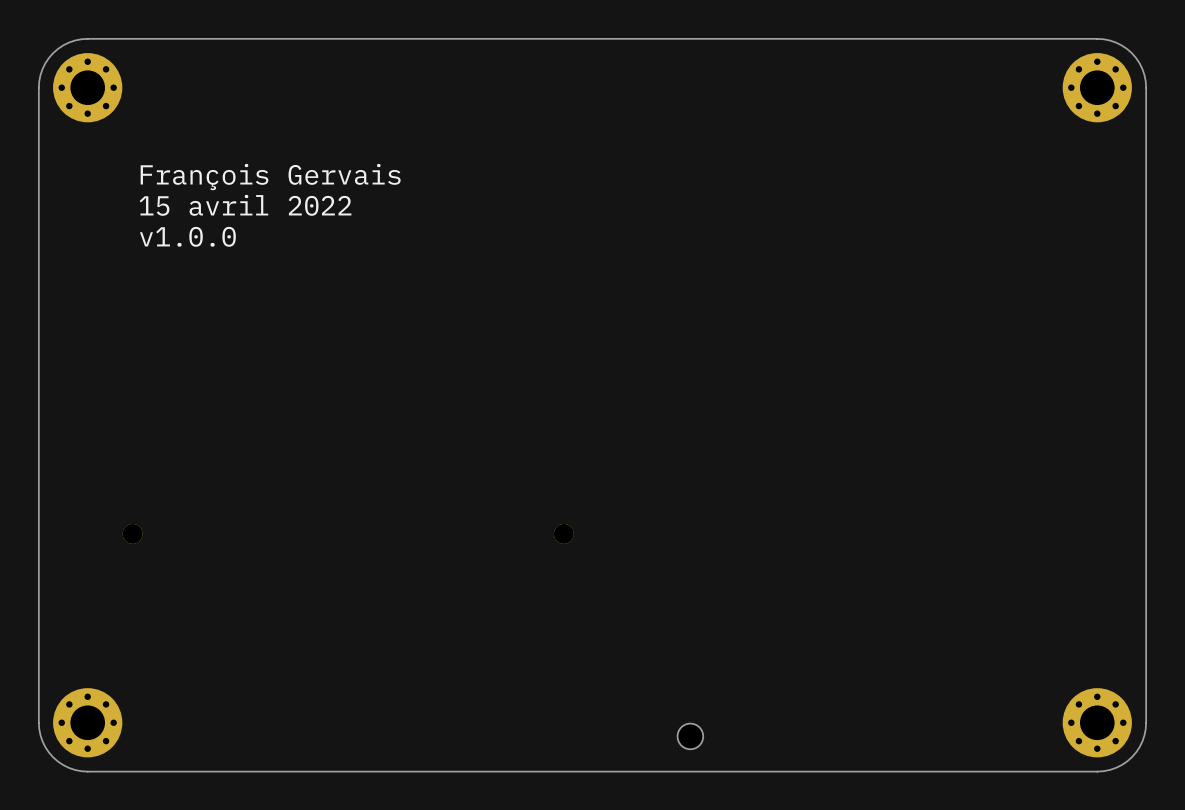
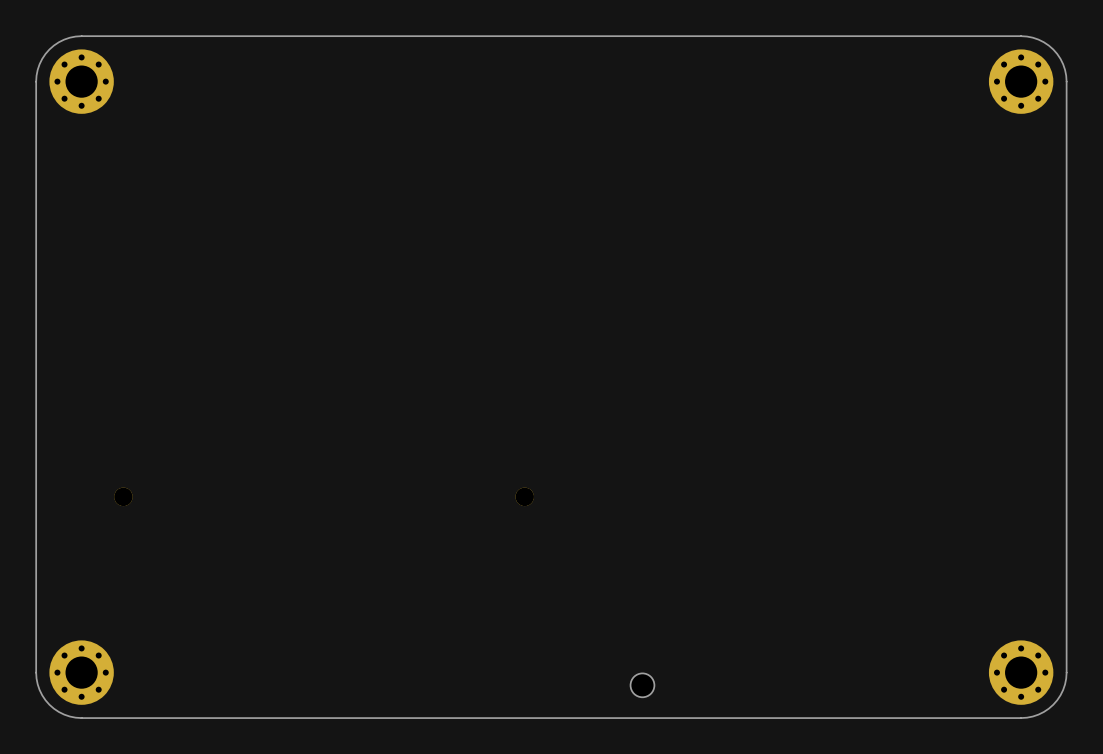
text: François Gervais (270, 177) -> none
text: 15 avril 2022 (245, 205) -> none
text: v1.0.0 (187, 236) -> none

